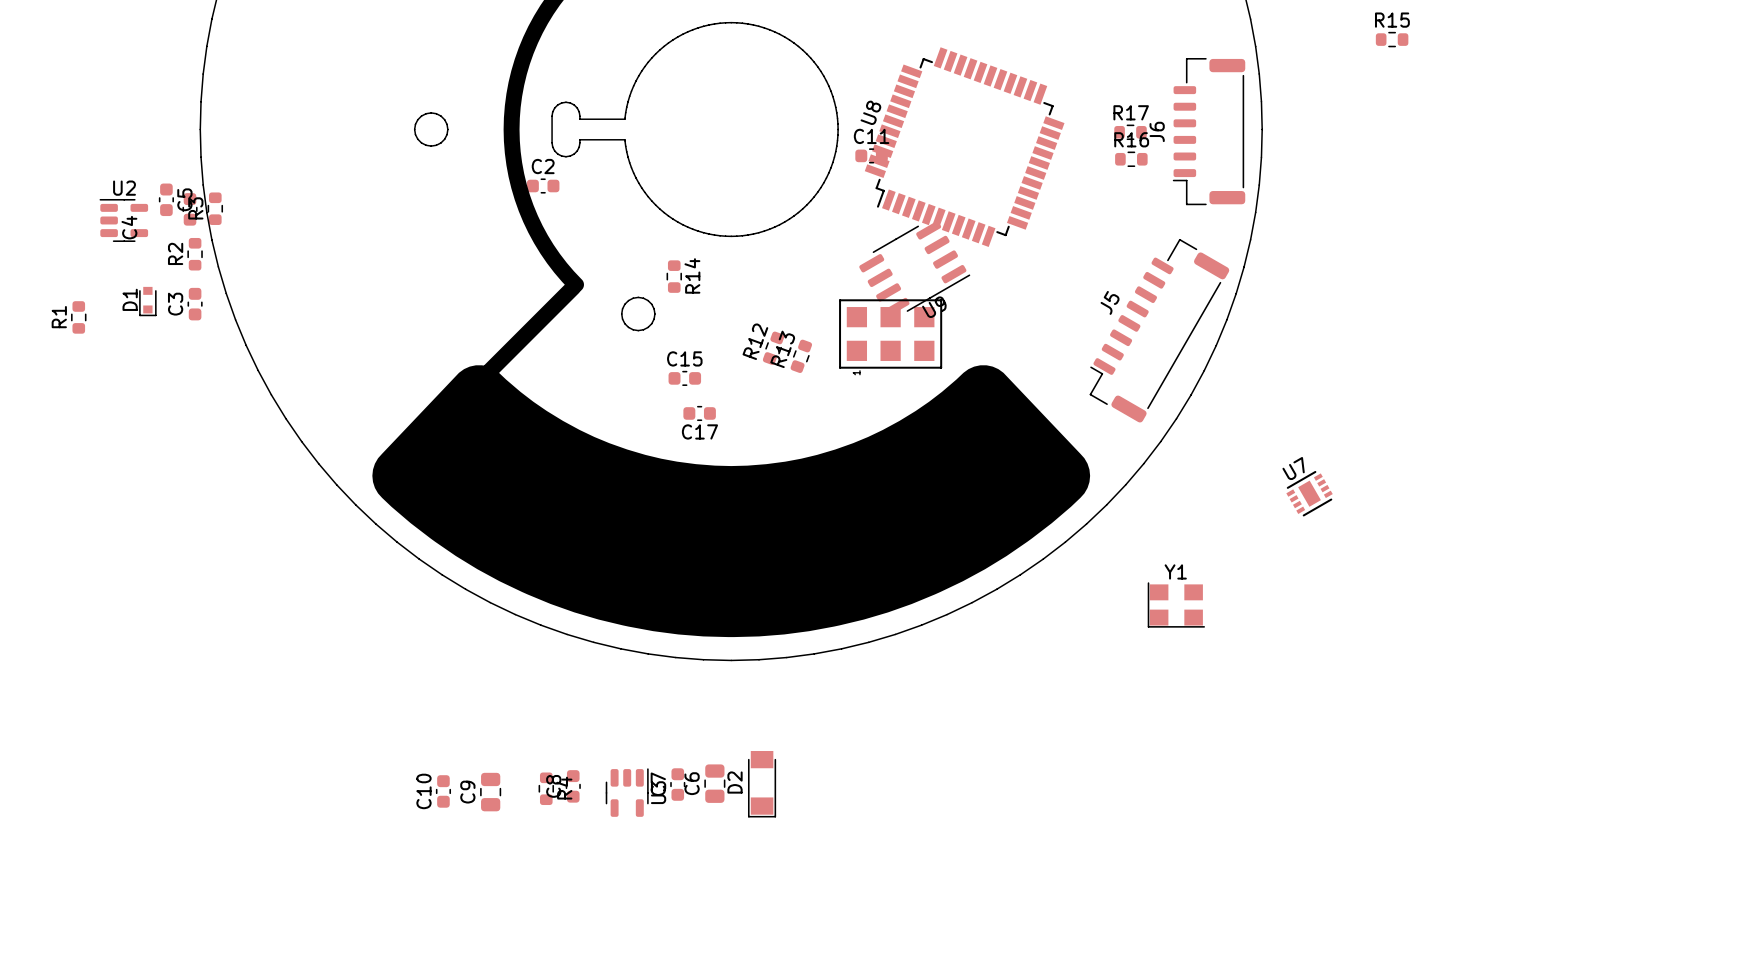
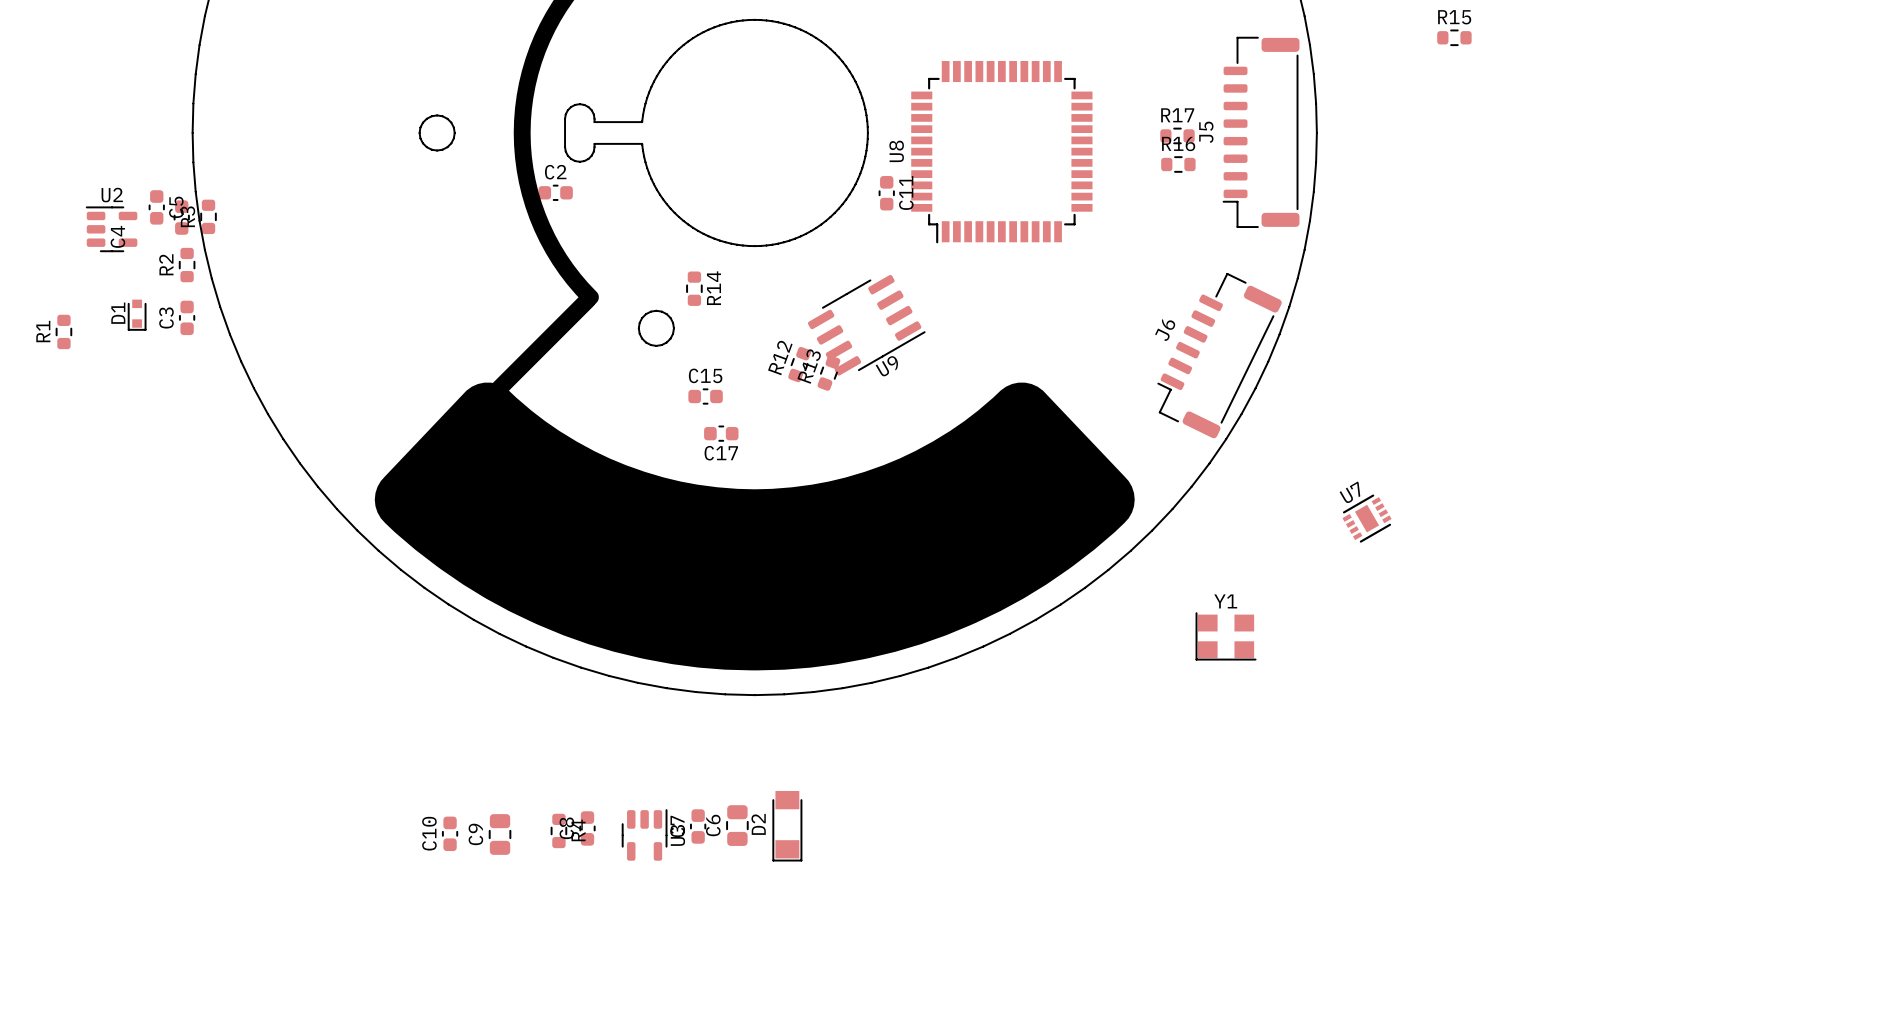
J6 rotation: 0° (1209, 131) -> 26° clockwise (1219, 355)
J6 position: (1209, 131) -> (1219, 355)
U8 rotation: 0° (964, 147) -> 20° counterclockwise (1001, 152)
C11 rotation: 0° (871, 155) -> 90° clockwise (886, 193)
C11 position: (871, 155) -> (886, 193)
U9 position: (914, 268) -> (866, 325)
J5 rotation: 0° (1159, 330) -> 30° counterclockwise (1261, 132)
J5 position: (1159, 330) -> (1261, 132)
part: (890, 334) -> none

